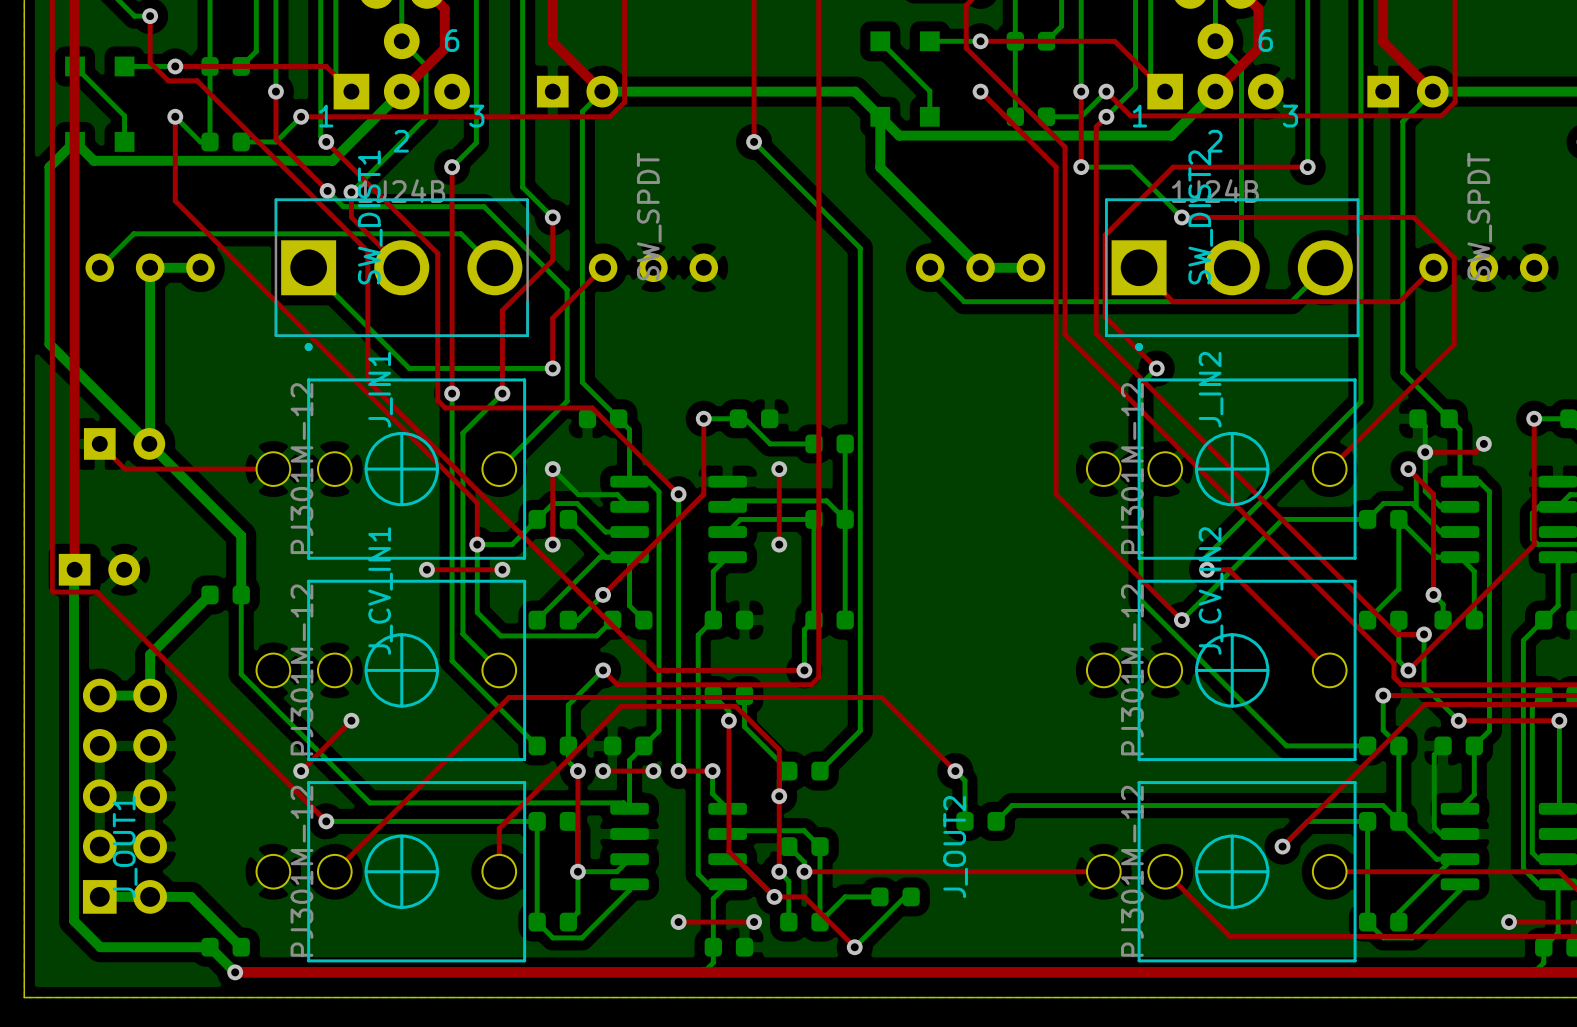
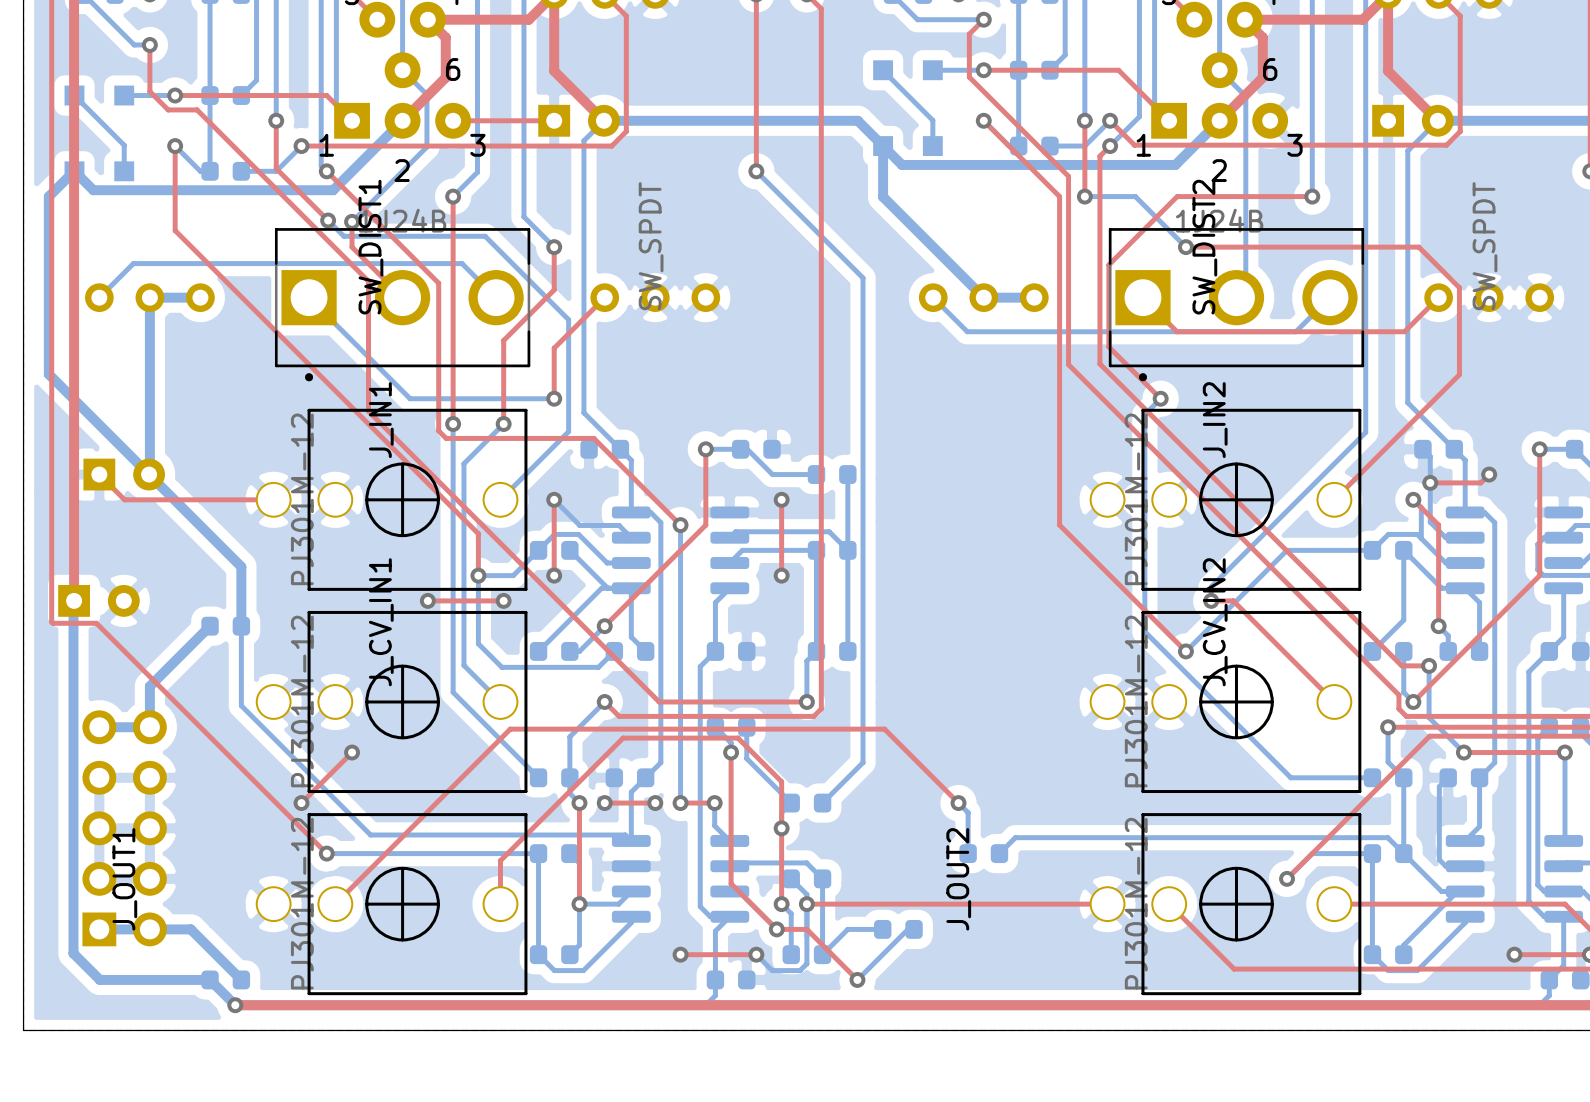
top track: none -> (453, 120) (554, 120)
bottom track: none -> (806, 904) (806, 963) (800, 970) (772, 970) (756, 954)

